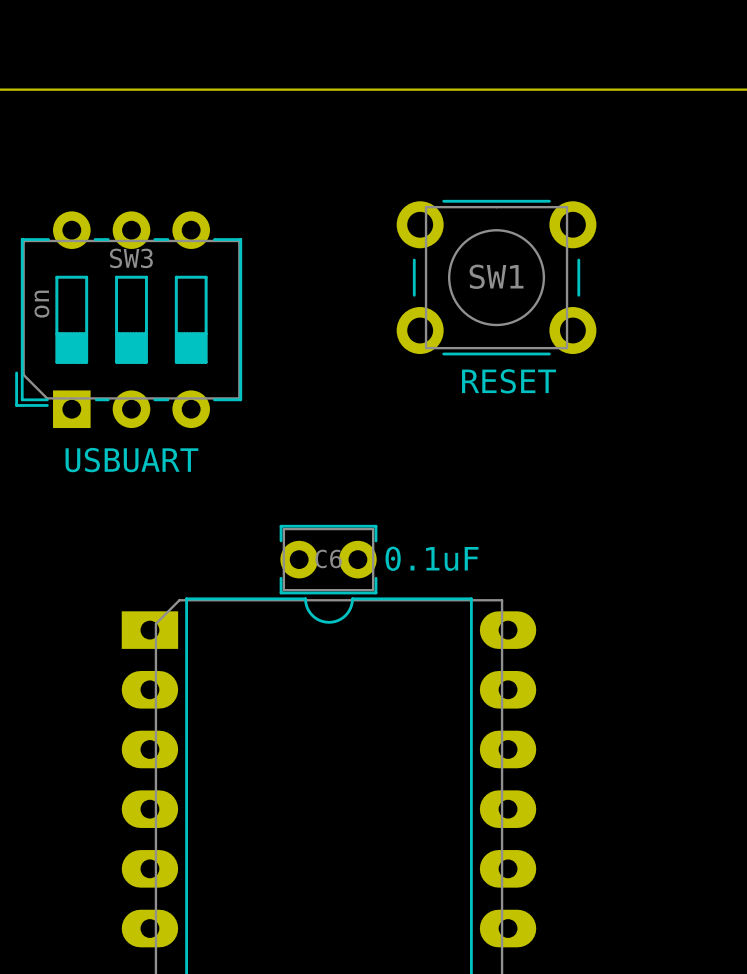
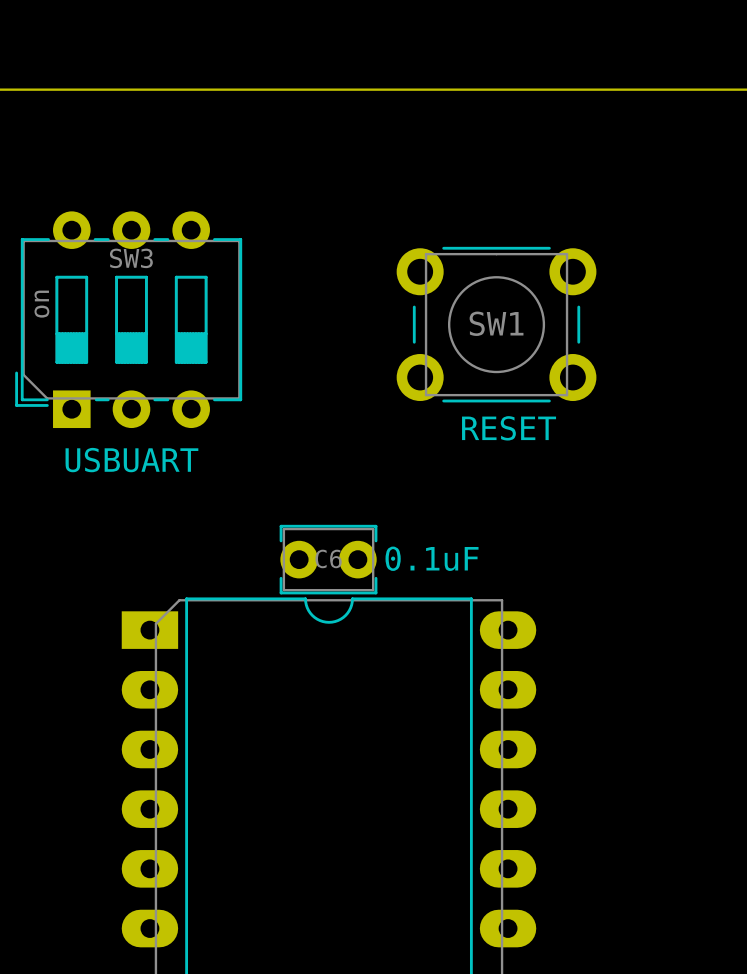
SW1 position: (496, 277) -> (496, 324)

